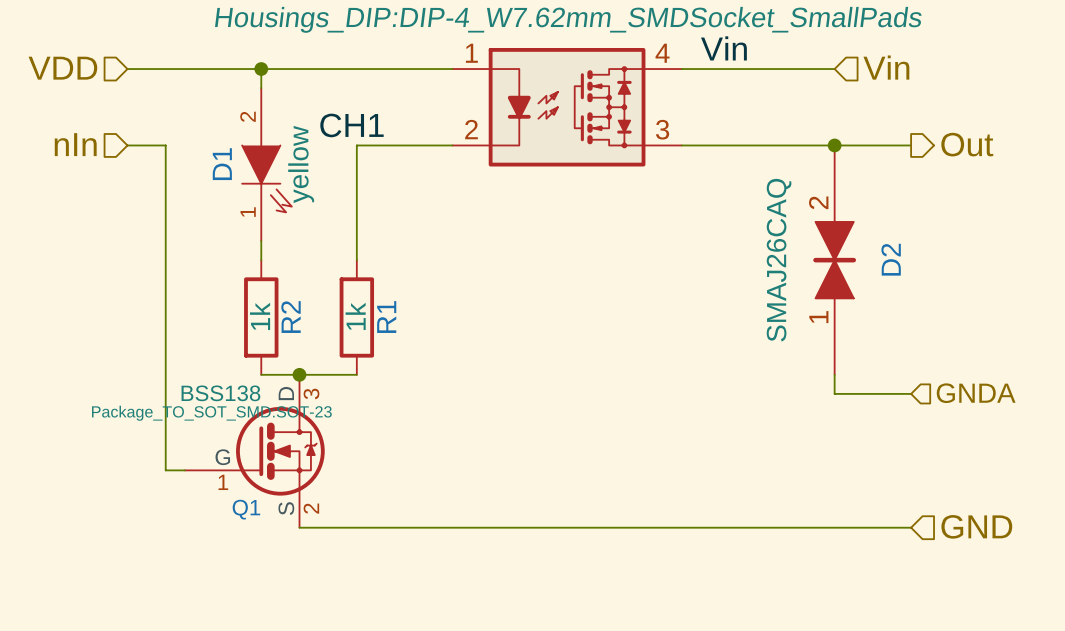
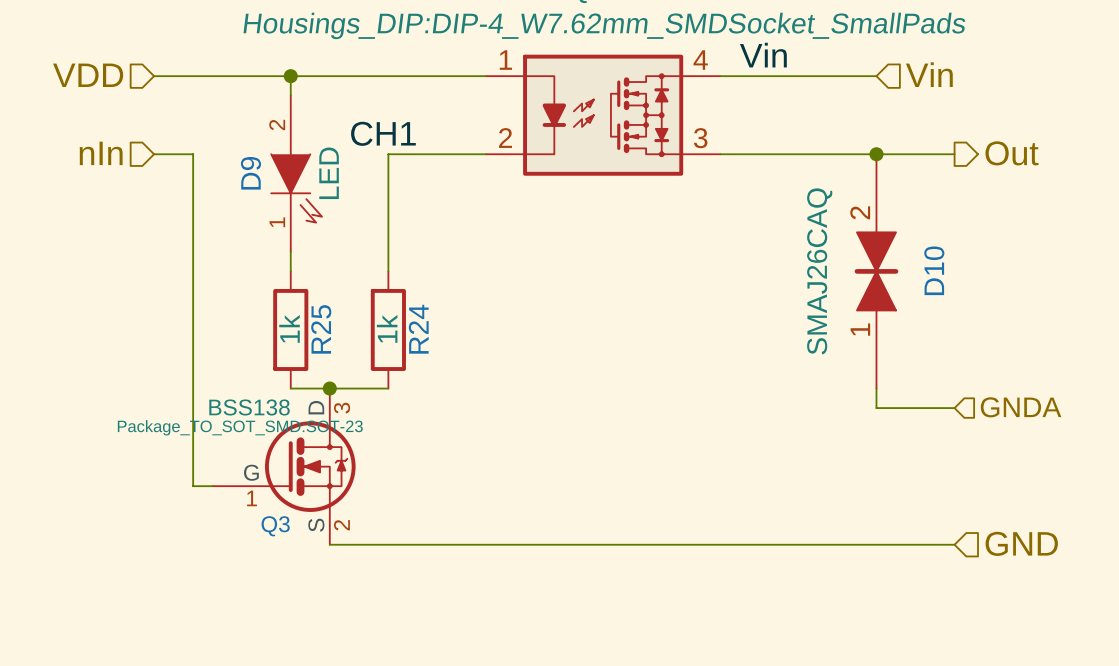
D1 name: D1 (222, 164) -> D9 (250, 173)
D1 value: yellow (301, 164) -> LED (329, 173)
D2 name: D2 (891, 259) -> D10 (934, 270)
R2 name: R2 (291, 317) -> R25 (321, 329)
R1 name: R1 (386, 317) -> R24 (418, 329)
Q1 name: Q1 (246, 509) -> Q3 (275, 526)

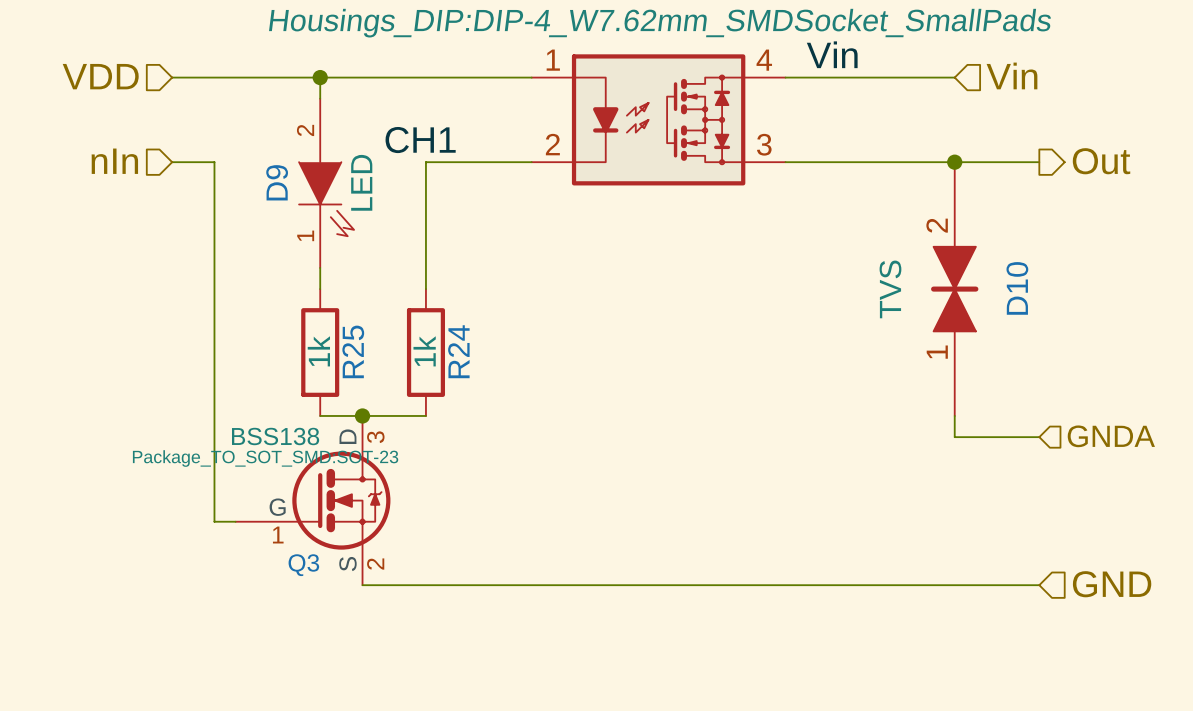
D10 value: SMAJ26CAQ (819, 271) -> TVS (890, 289)

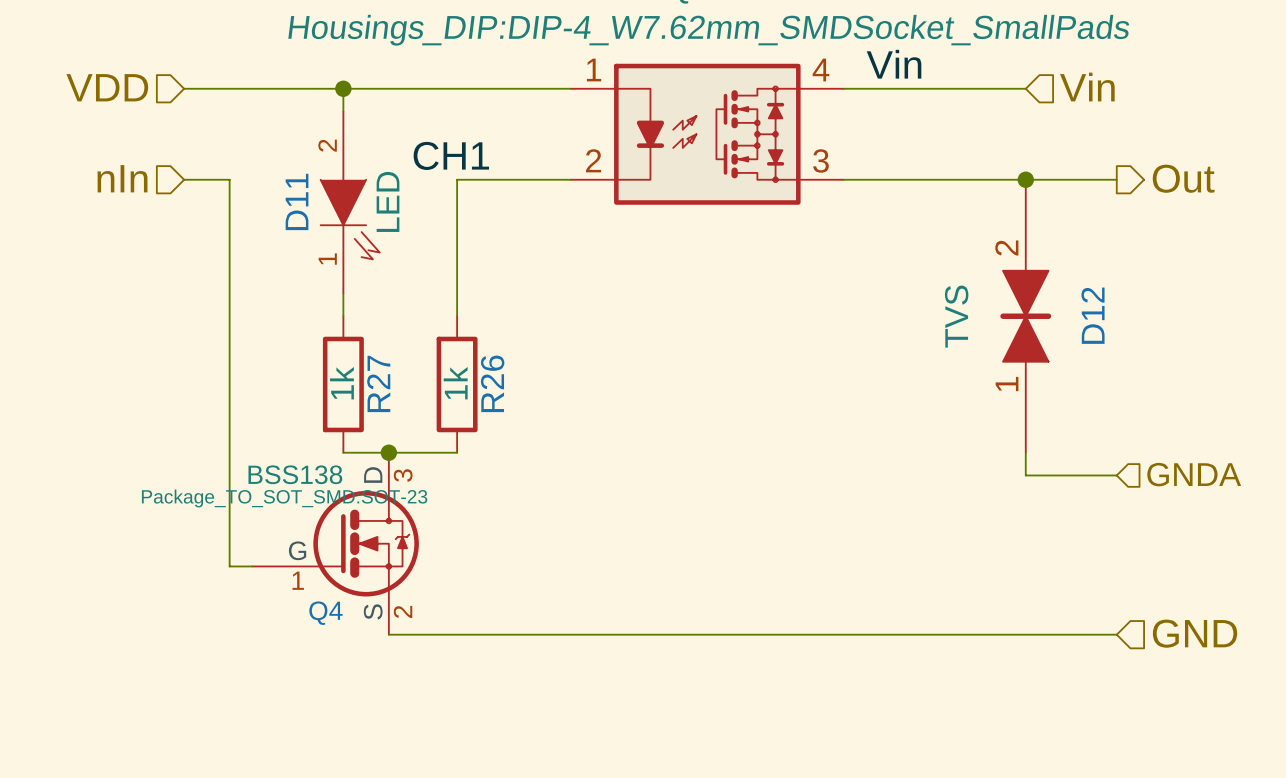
D9 name: D9 (277, 182) -> D11 (297, 201)
D10 name: D10 (1017, 288) -> D12 (1093, 315)
R25 name: R25 (353, 351) -> R27 (378, 383)
R24 name: R24 (458, 351) -> R26 (492, 383)
Q3 name: Q3 (303, 565) -> Q4 (325, 613)

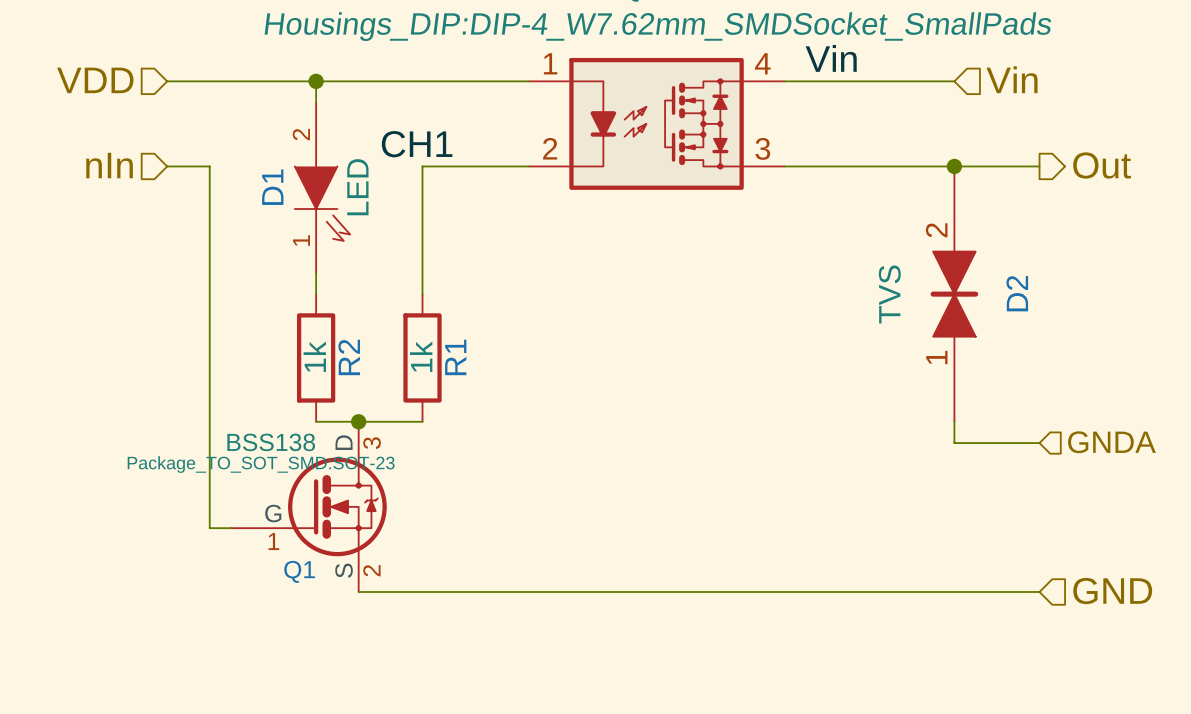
D11 name: D11 (297, 201) -> D1 (272, 187)
D12 name: D12 (1093, 315) -> D2 (1017, 293)
R27 name: R27 (378, 383) -> R2 (349, 357)
R26 name: R26 (492, 383) -> R1 (455, 357)
Q4 name: Q4 (325, 613) -> Q1 (299, 571)

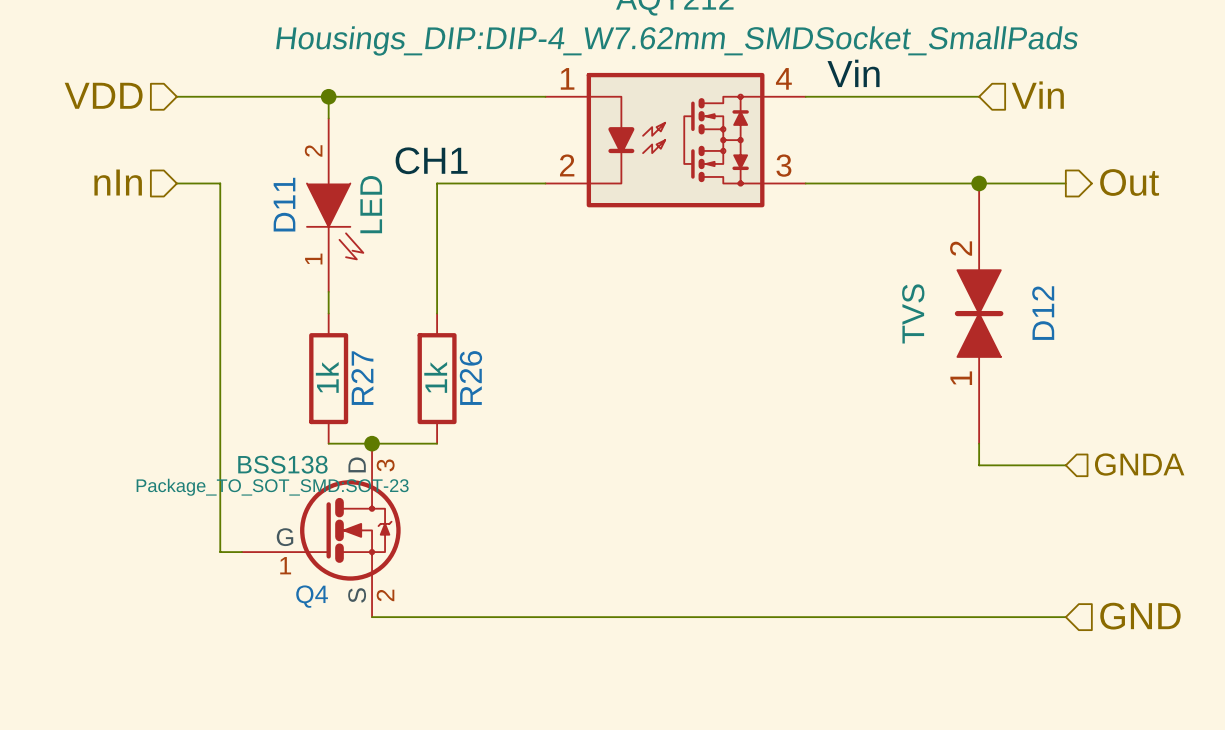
D1 name: D1 (272, 187) -> D11 (284, 204)
D2 name: D2 (1017, 293) -> D12 (1043, 313)
R2 name: R2 (349, 357) -> R27 (362, 378)
R1 name: R1 (455, 357) -> R26 (470, 378)
Q1 name: Q1 (299, 571) -> Q4 (312, 596)

